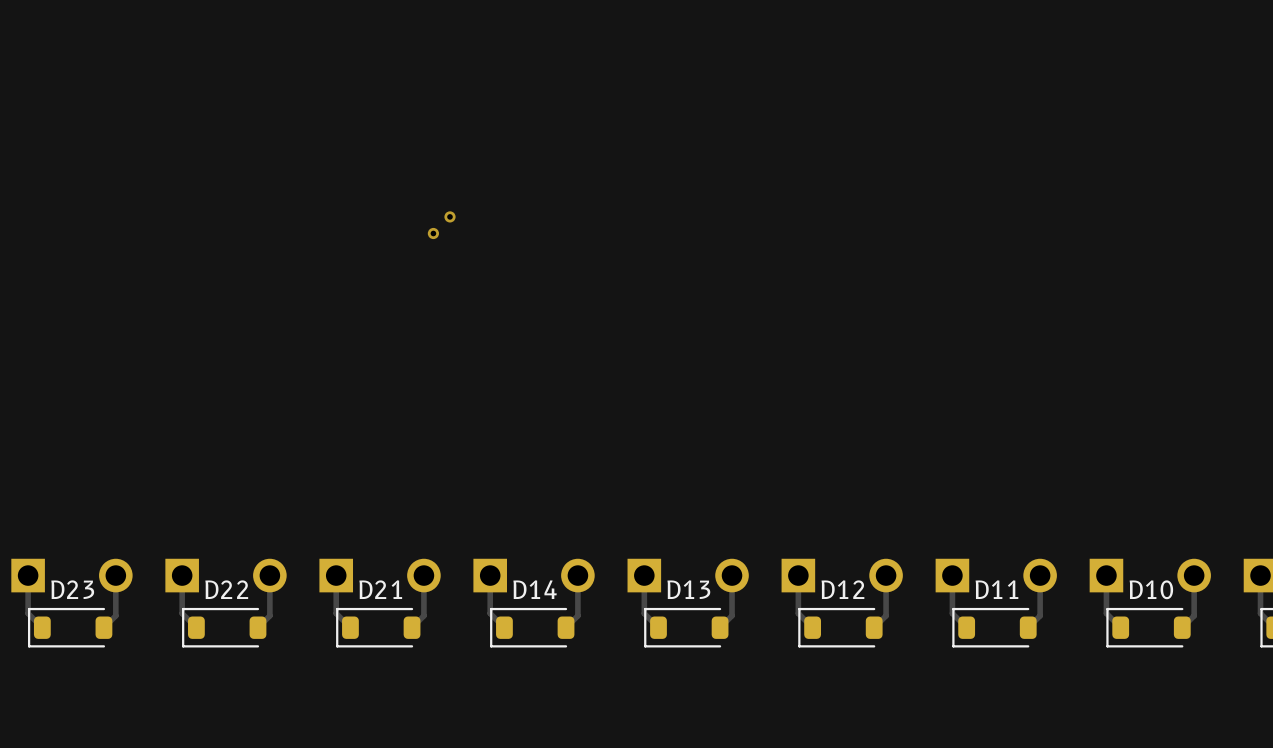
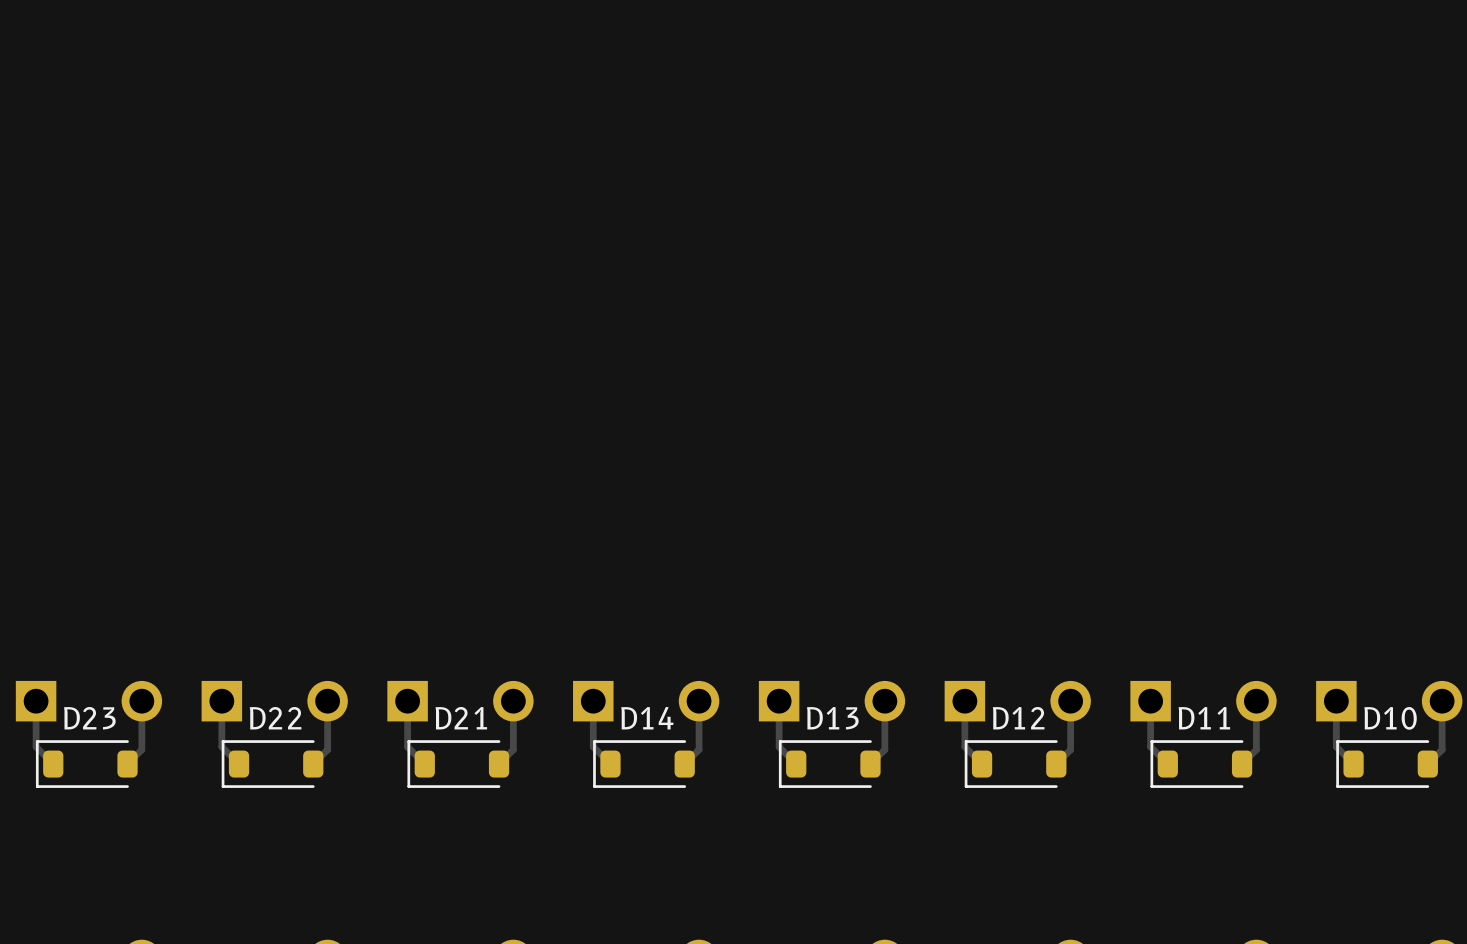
via: (449, 216) -> none
via: (433, 233) -> none

